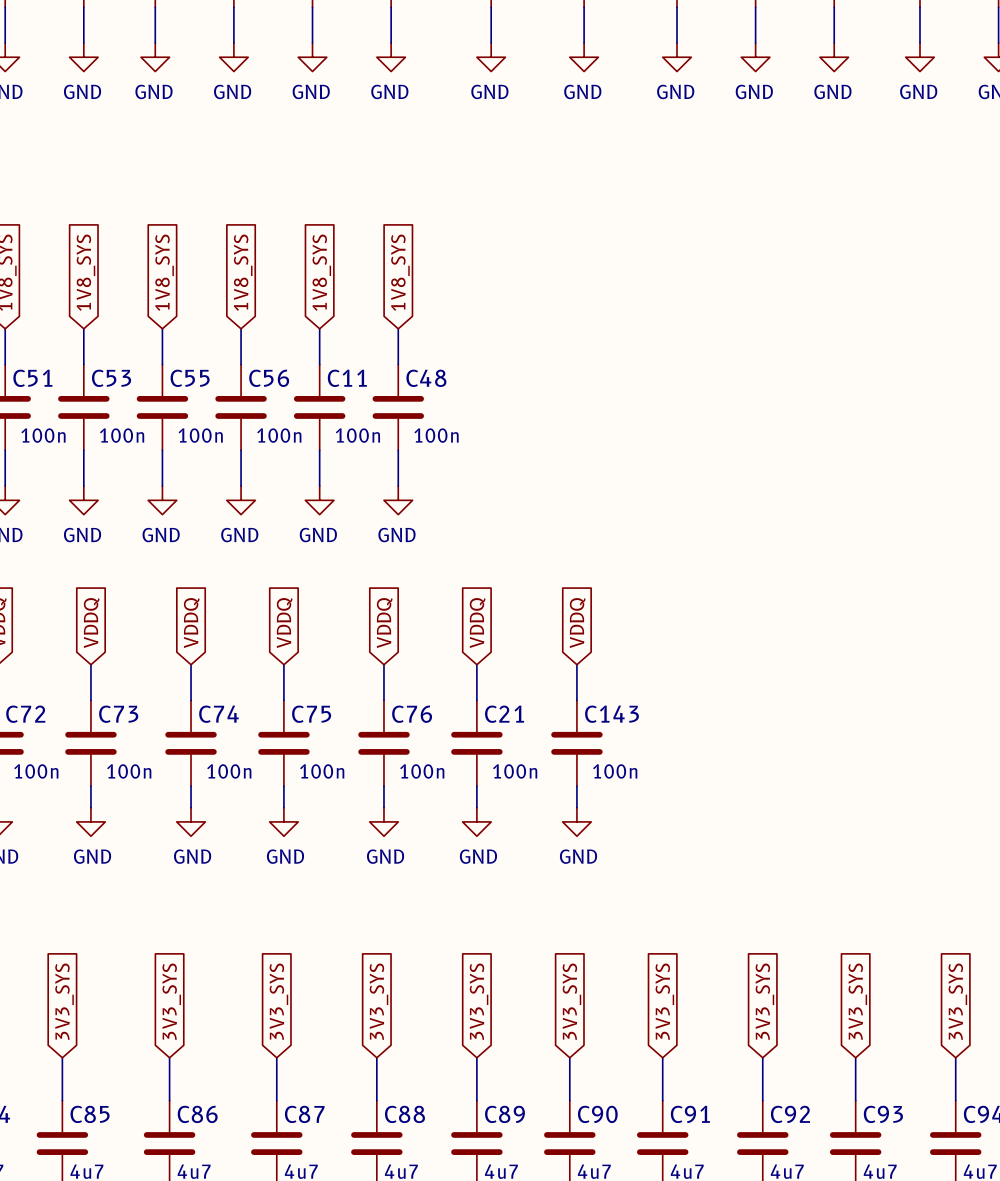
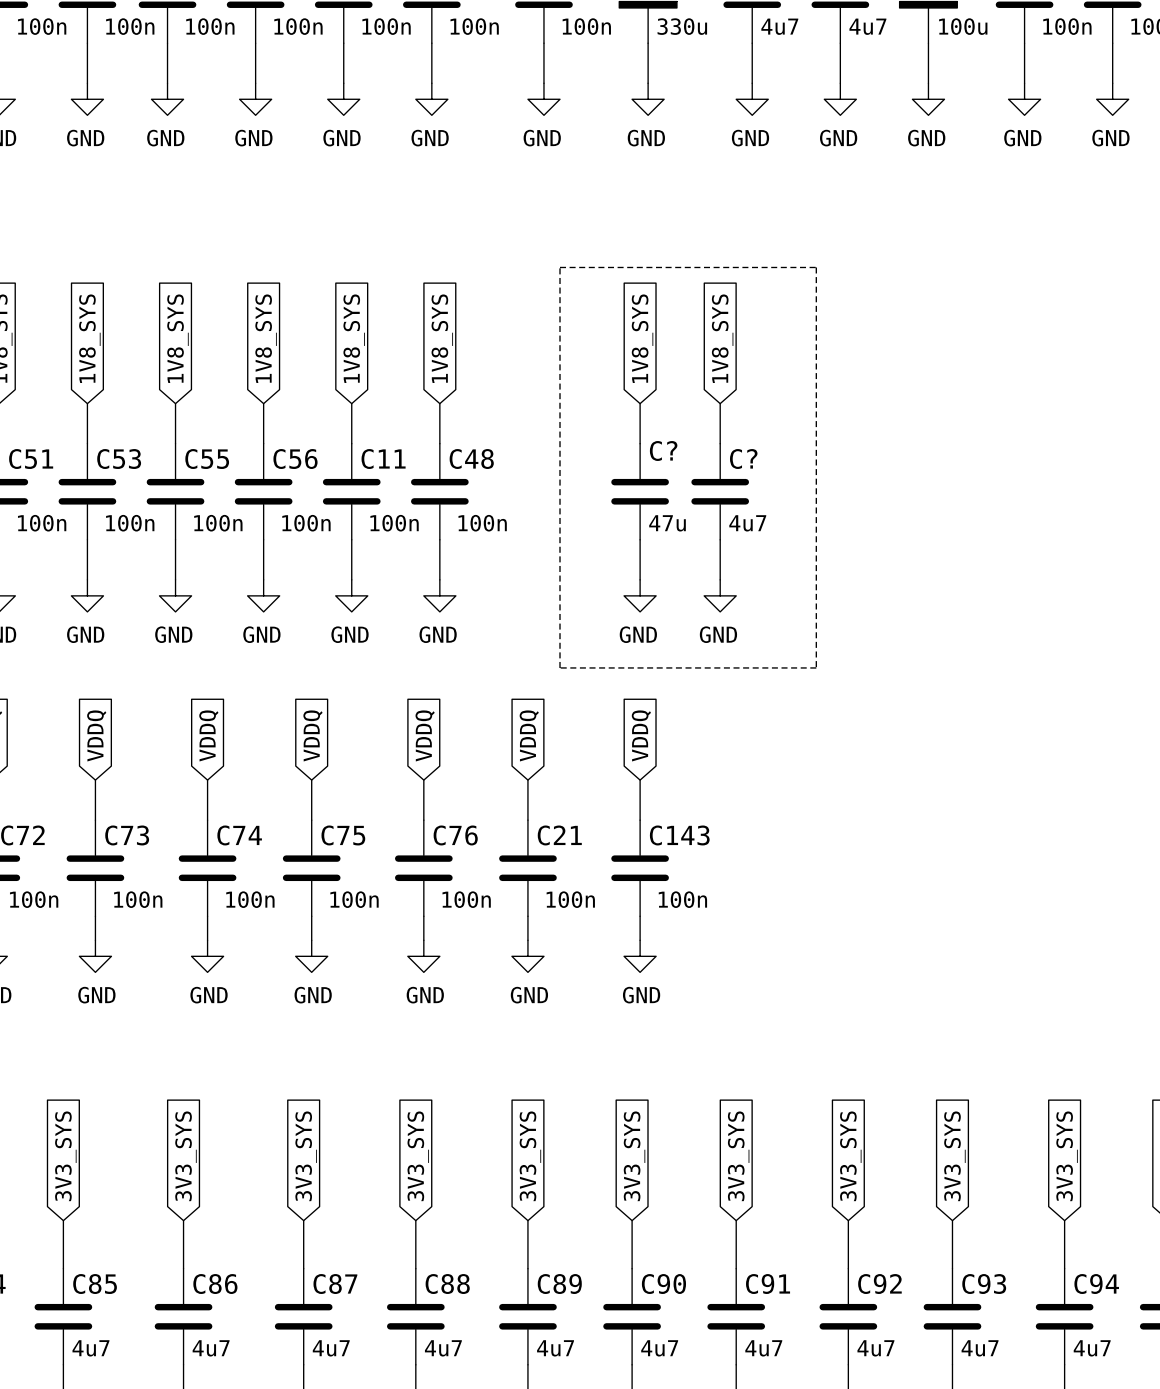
line: none -> (560, 267) (560, 667) (816, 667) (816, 267) (560, 267)
global label: none -> 1V8_SYS (642, 338)
global label: none -> 1V8_SYS (722, 338)
wire: none -> (640, 403) (640, 443)
wire: none -> (720, 403) (720, 443)
C?: none -> (640, 491)
C?: none -> (720, 491)
wire: none -> (640, 539) (640, 579)
wire: none -> (720, 539) (720, 579)
power symbol: none -> GND (640, 595)
power symbol: none -> GND (720, 595)

